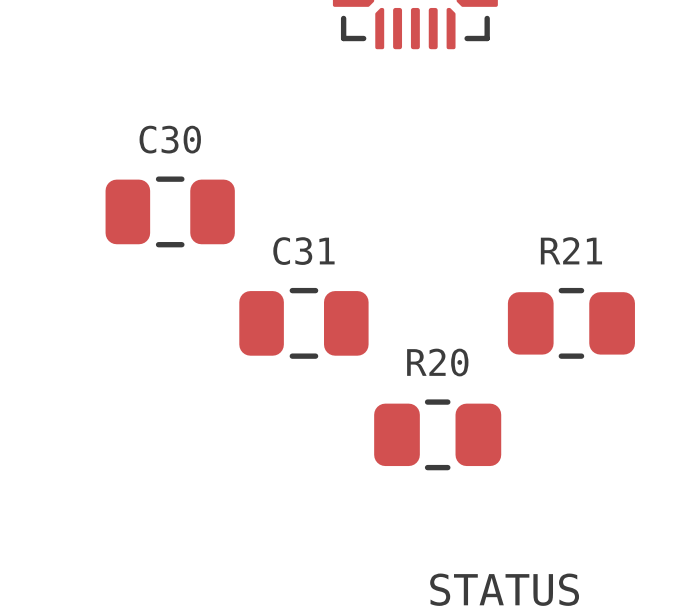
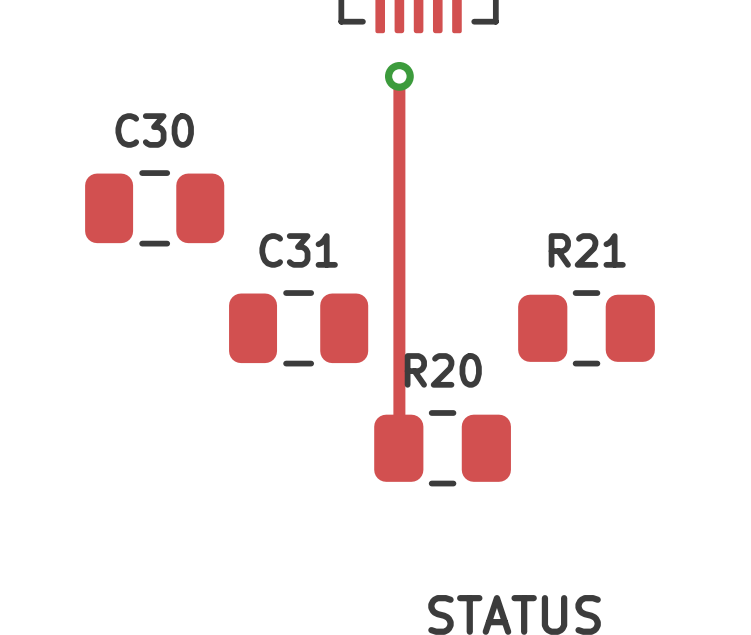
track: none -> (399, 76) (399, 448)
via: none -> (399, 76)

